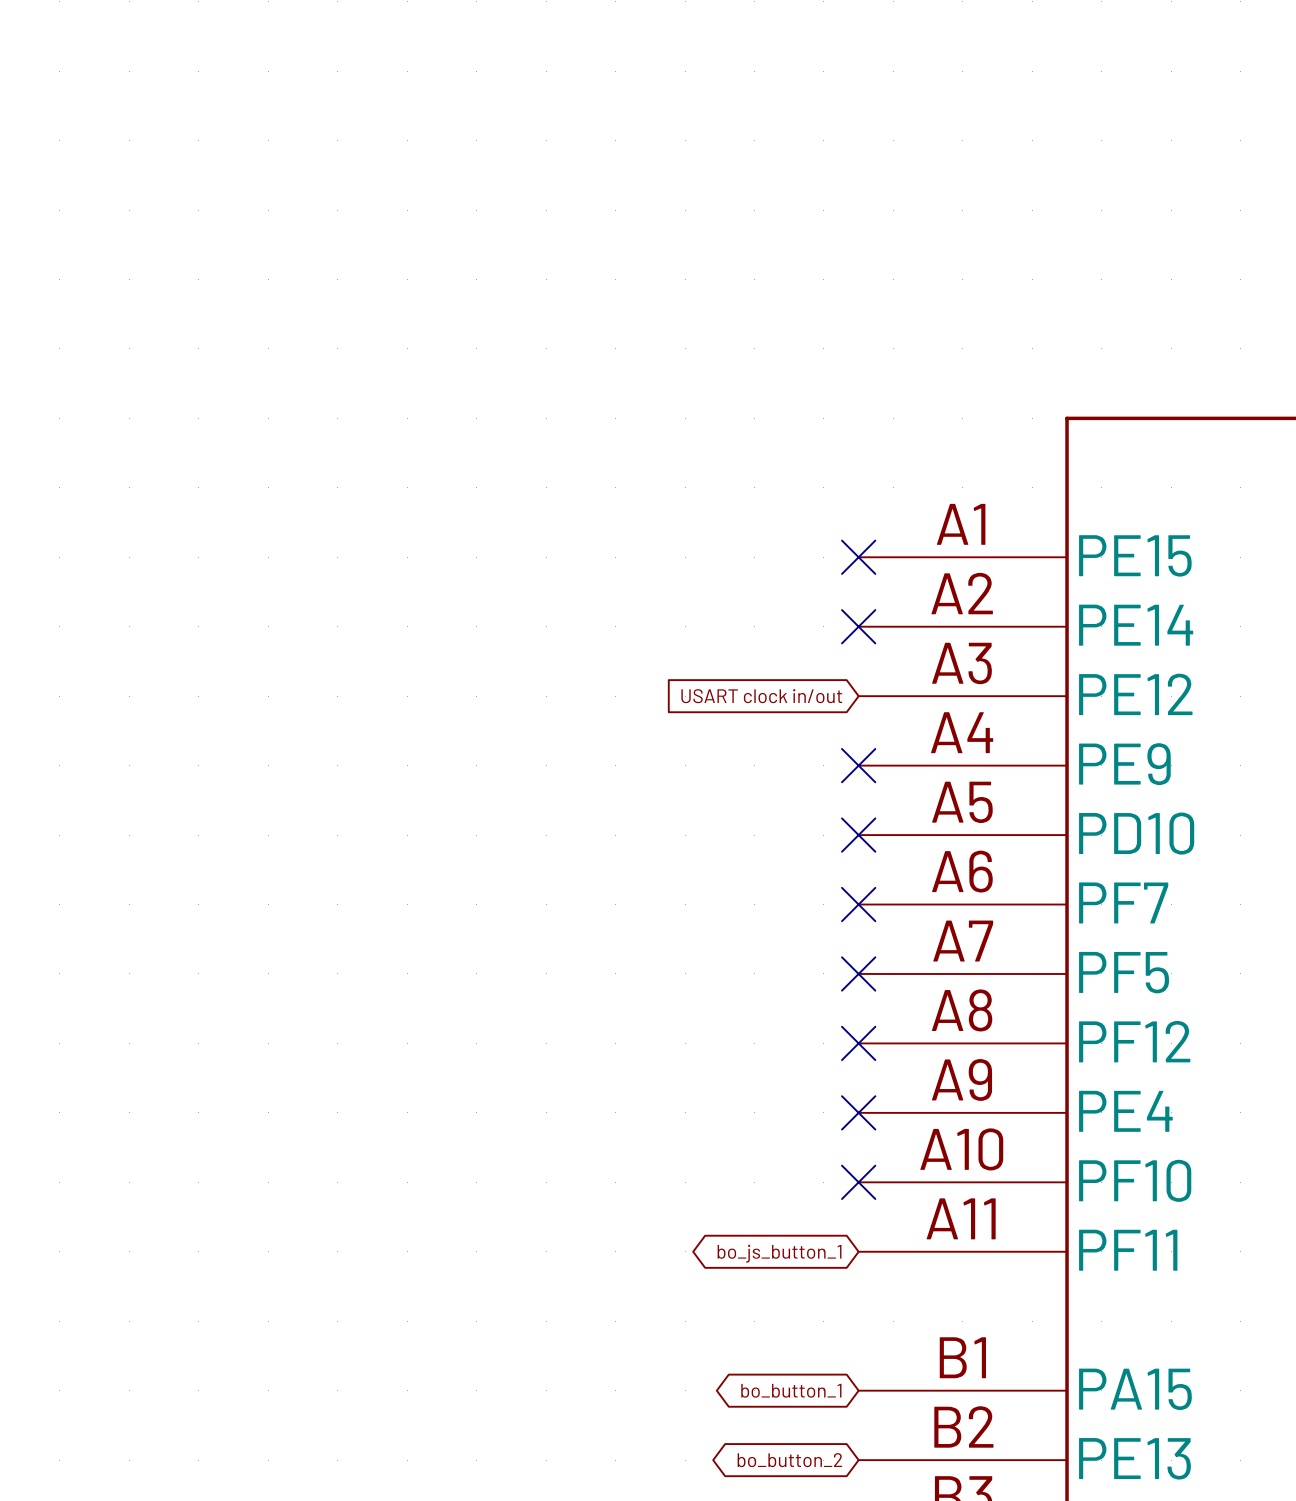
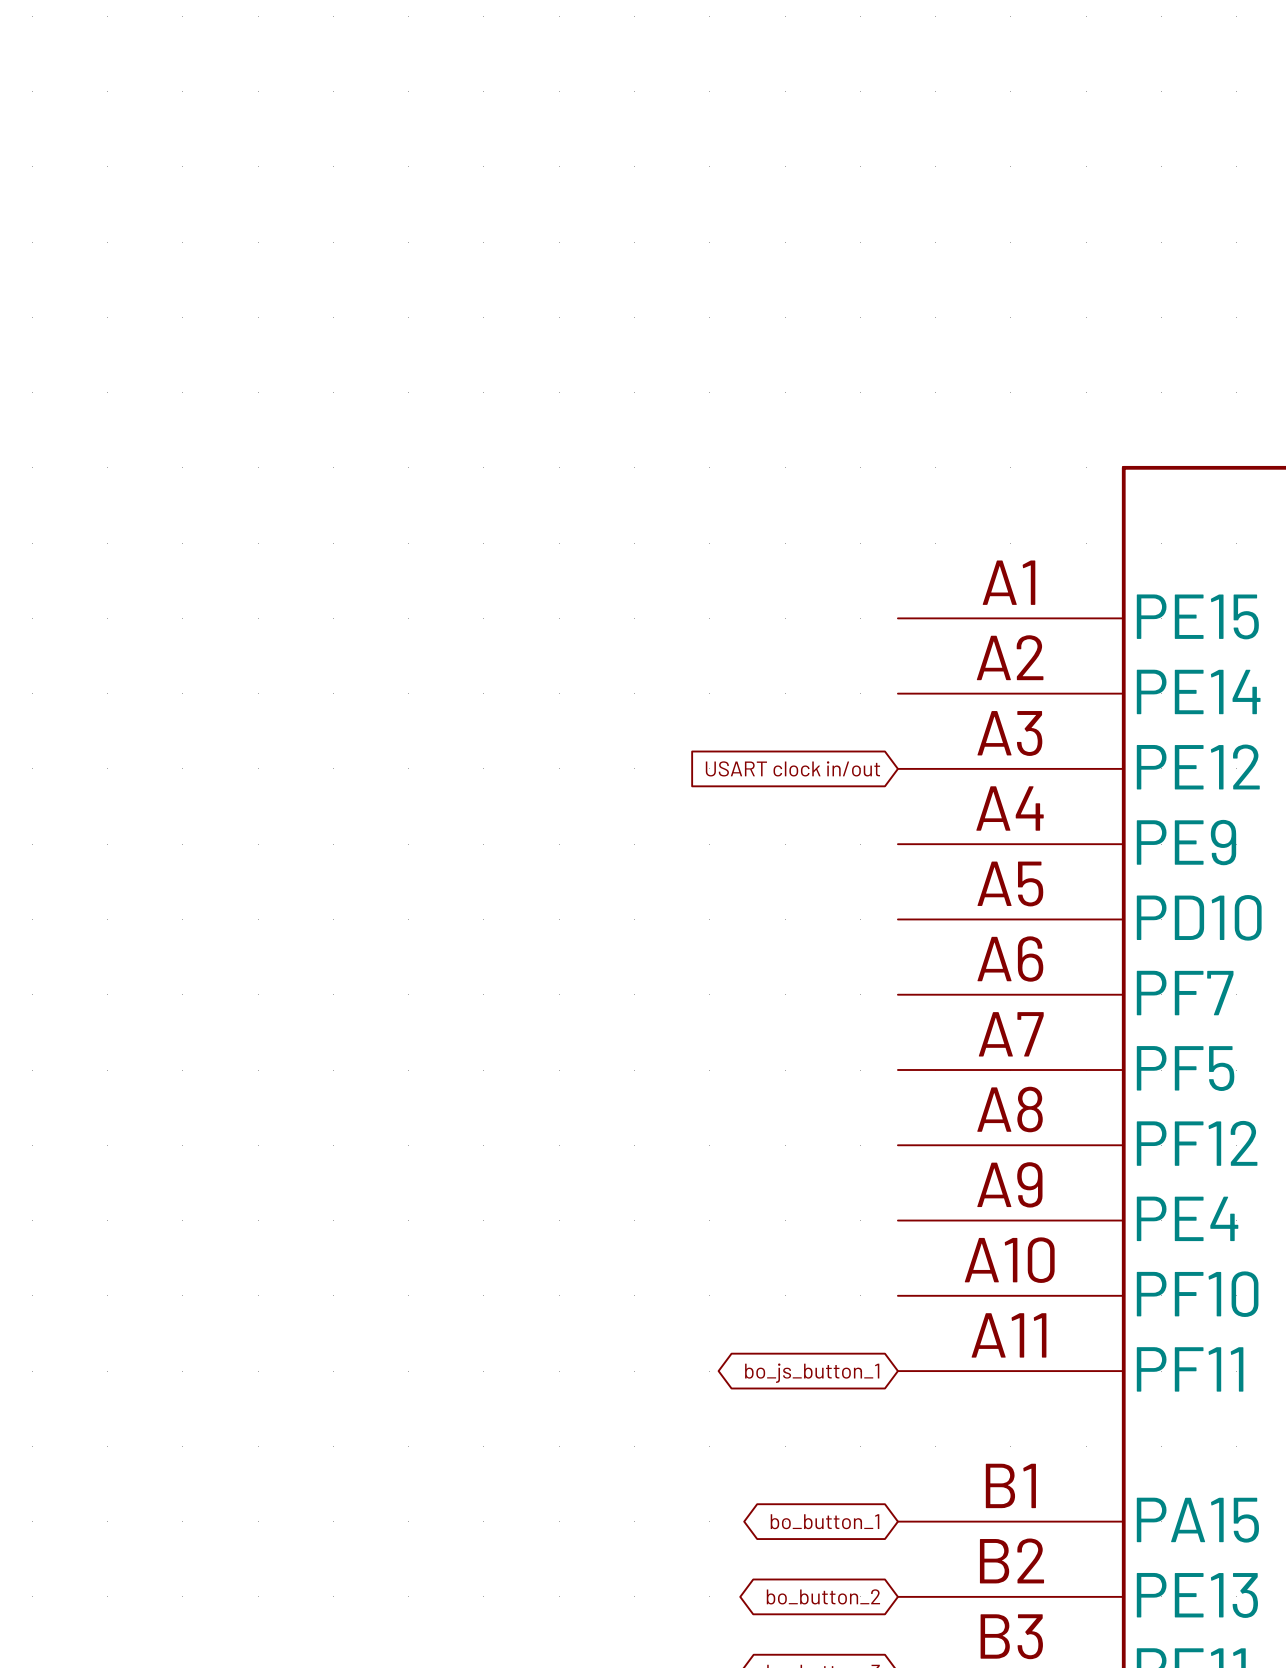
no-connect mark: (858, 557) -> none
no-connect mark: (858, 626) -> none
no-connect mark: (858, 765) -> none
no-connect mark: (858, 835) -> none
no-connect mark: (858, 904) -> none
no-connect mark: (858, 973) -> none
no-connect mark: (858, 1043) -> none
no-connect mark: (858, 1112) -> none
no-connect mark: (858, 1182) -> none

